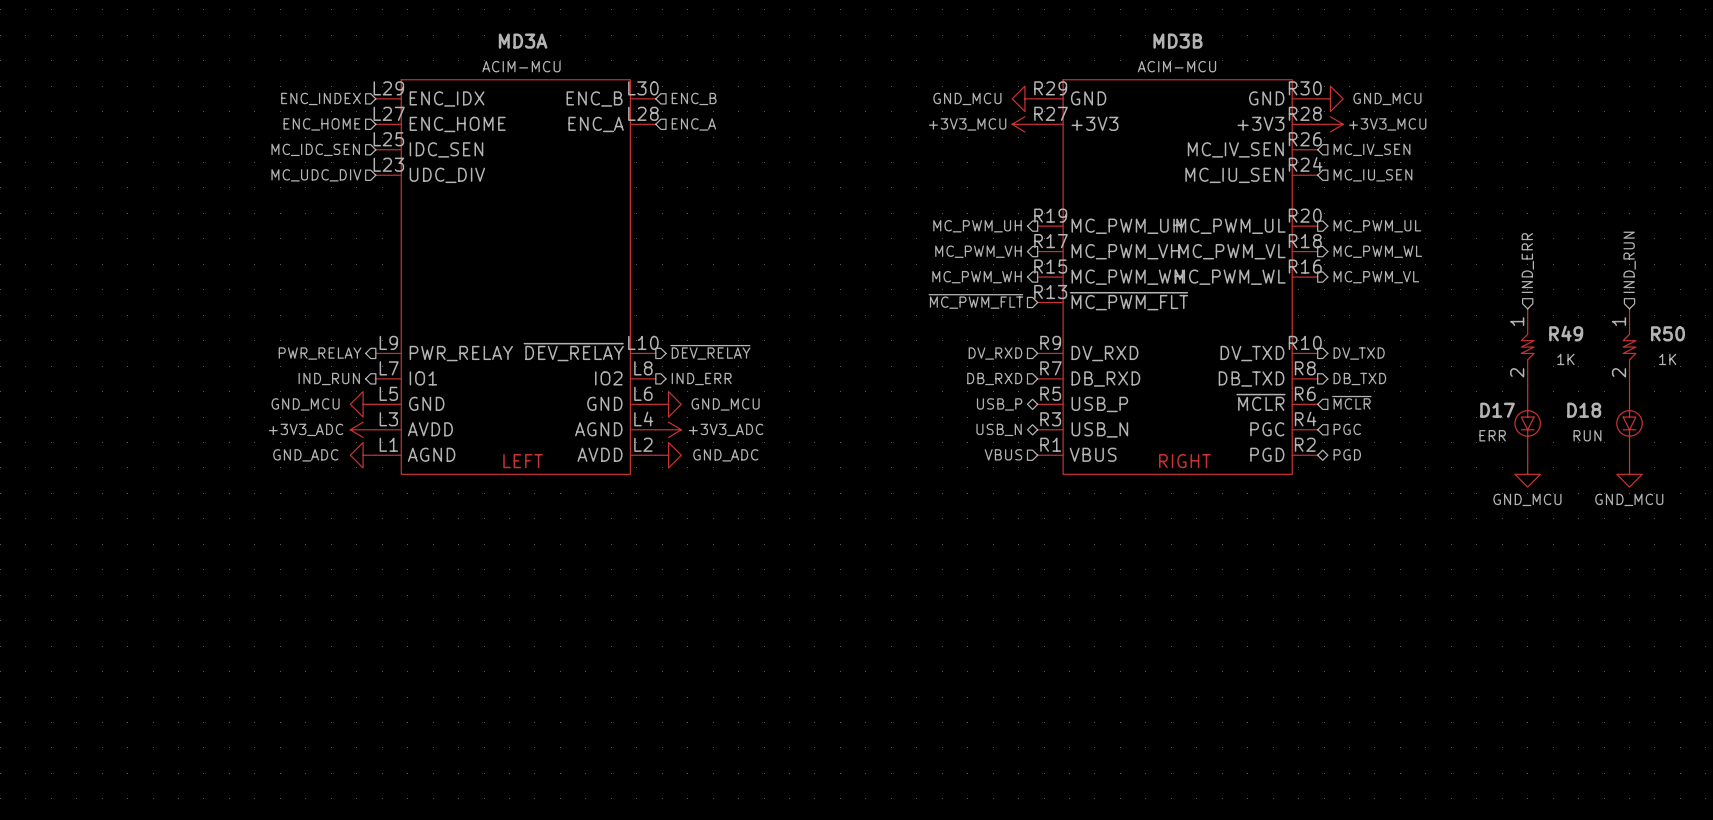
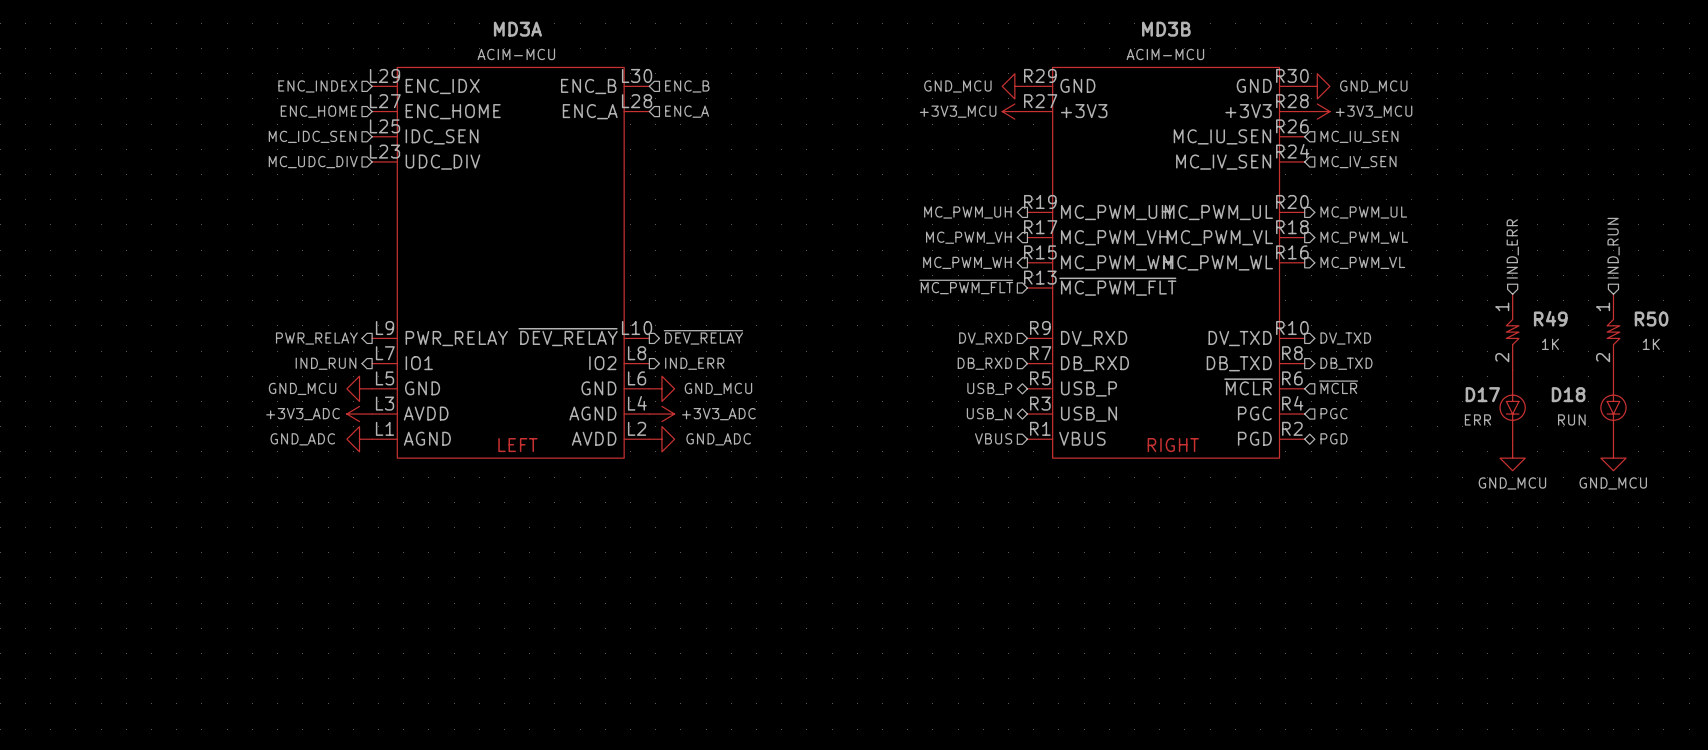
MD3B pin name: MC_IV_SEN (1235, 149) -> MC_IU_SEN (1222, 136)
hierarchical label: MC_IV_SEN (1371, 149) -> MC_IU_SEN (1359, 136)
MD3B pin name: MC_IU_SEN (1234, 175) -> MC_IV_SEN (1223, 162)
hierarchical label: MC_IU_SEN (1372, 175) -> MC_IV_SEN (1358, 162)

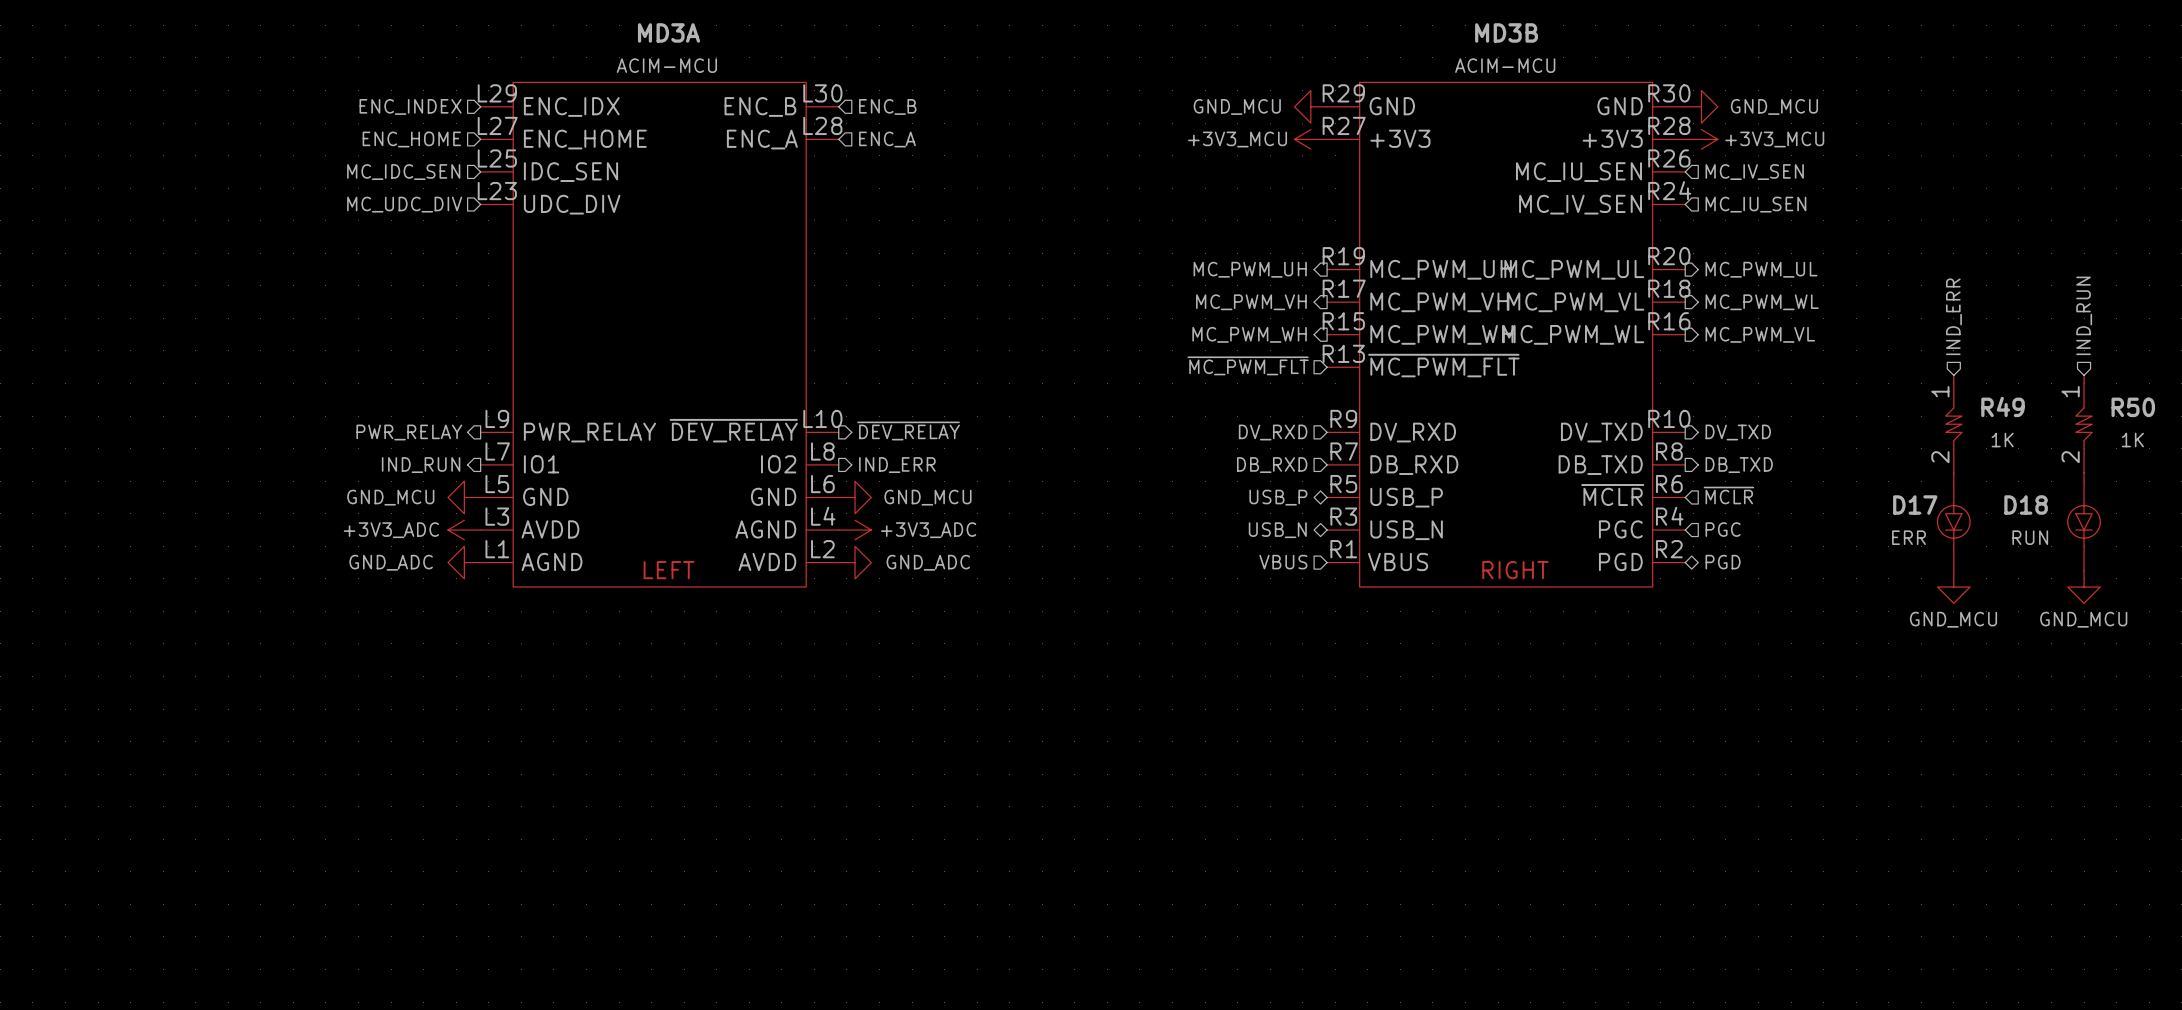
hierarchical label: MC_IU_SEN (1359, 136) -> MC_IV_SEN (1754, 172)
hierarchical label: MC_IV_SEN (1358, 162) -> MC_IU_SEN (1755, 204)

